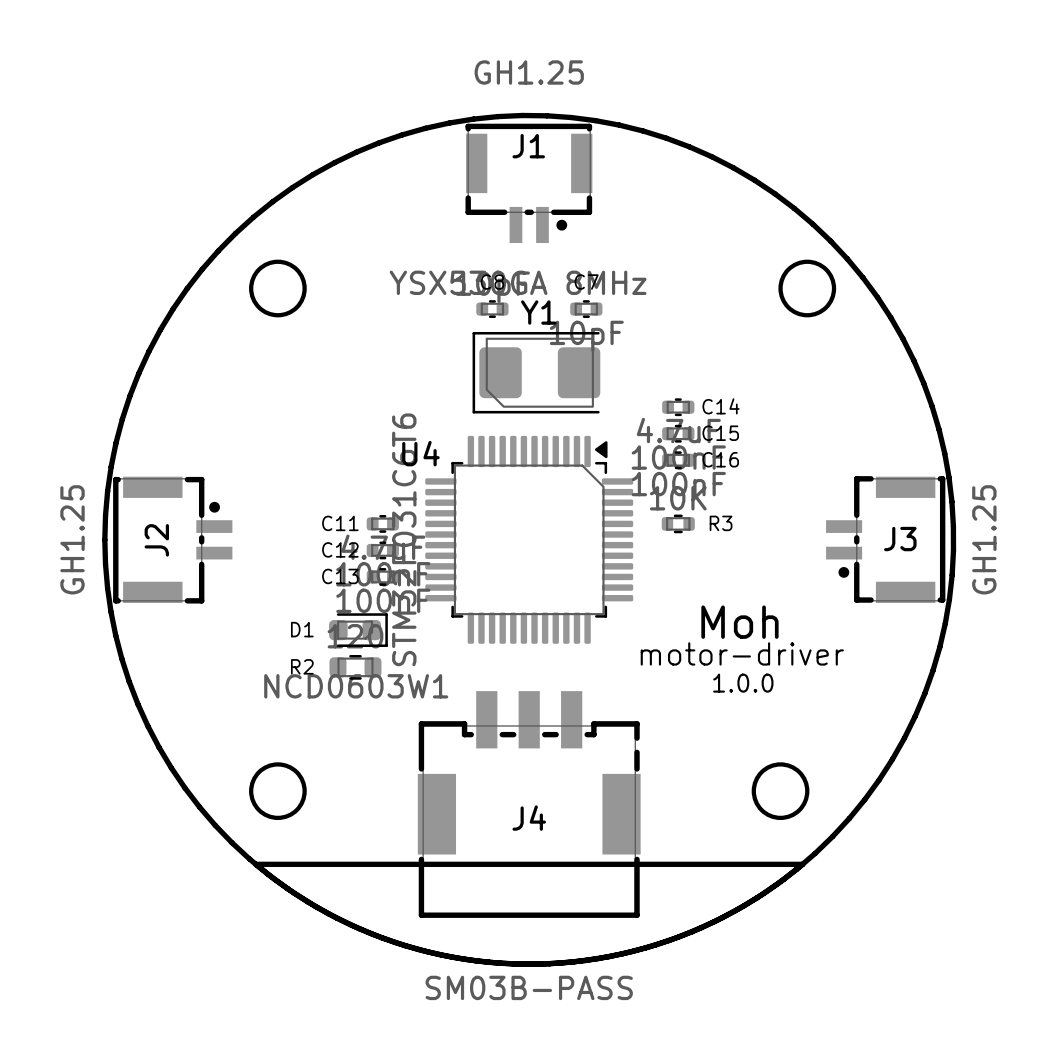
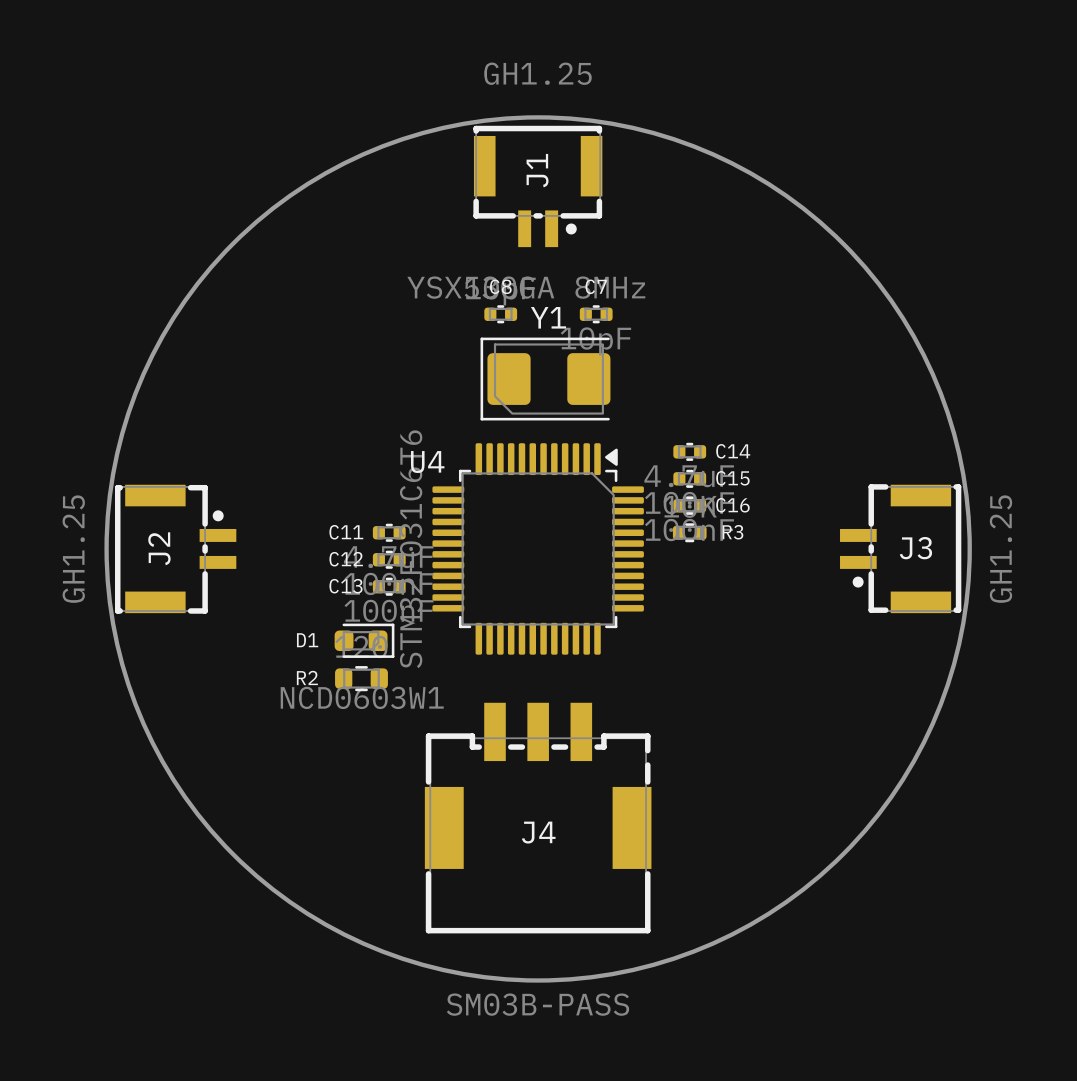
round board edge: none -> [104, 115, 972, 983]
board edge: (522, 115) (595, 120) (643, 131) (689, 146) (754, 180) (813, 224) (847, 259) (877, 297) (914, 360) (939, 429) (949, 477) (953, 526) (952, 575) (939, 647) (915, 716) (892, 759) (849, 818) (815, 853) (796, 869) (777, 884) (756, 897) (735, 910) (714, 921) (692, 931) (669, 940) (645, 947) (622, 953) (598, 958) (574, 961) (549, 963) (525, 964) (500, 963) (476, 960) (452, 957) (428, 952) (404, 945) (381, 937) (359, 928) (337, 918) (315, 906) (294, 893) (274, 879) (255, 864) (802, 864) (783, 879) (764, 893) (743, 906) (722, 917) (700, 927) (678, 937) (655, 944) (632, 951) (609, 956) (585, 960) (561, 963) (537, 964) (513, 963) (489, 962) (465, 959) (441, 955) (418, 949) (395, 942) (372, 934) (350, 924) (328, 913) (307, 901) (287, 888) (268, 874) (249, 859) (232, 842) (199, 807) (171, 768) (137, 704) (121, 658) (110, 611) (104, 539) (107, 491) (116, 442) (138, 373) (173, 308) (218, 250) (272, 201) (313, 174) (356, 152) (402, 134) (449, 122) (522, 115) -> none
J1 name rotation: 0° (528, 146) -> 90° counterclockwise (537, 170)
round board edge: [249, 259, 307, 318] -> none
round board edge: [778, 259, 837, 318] -> none
C14 position: (678, 407) -> (689, 451)
C15 position: (678, 433) -> (689, 478)
C16 position: (678, 460) -> (689, 505)
text: Moh (739, 622) -> none
text: motor-driver (742, 653) -> none
text: 1.0.0 (743, 683) -> none
round board edge: [249, 762, 307, 821] -> none
round board edge: [751, 762, 810, 821] -> none

